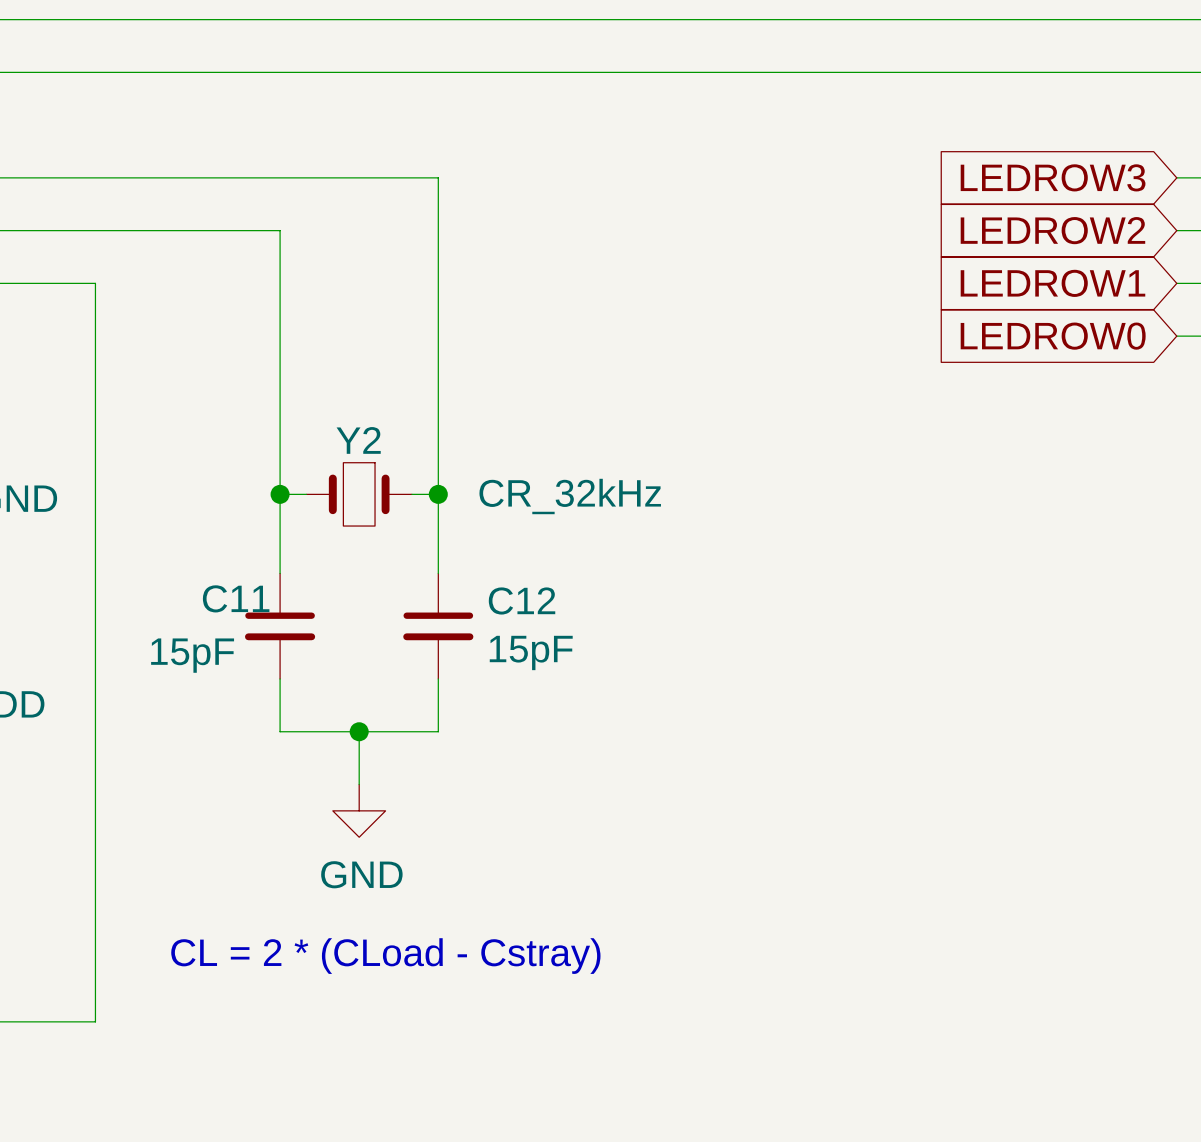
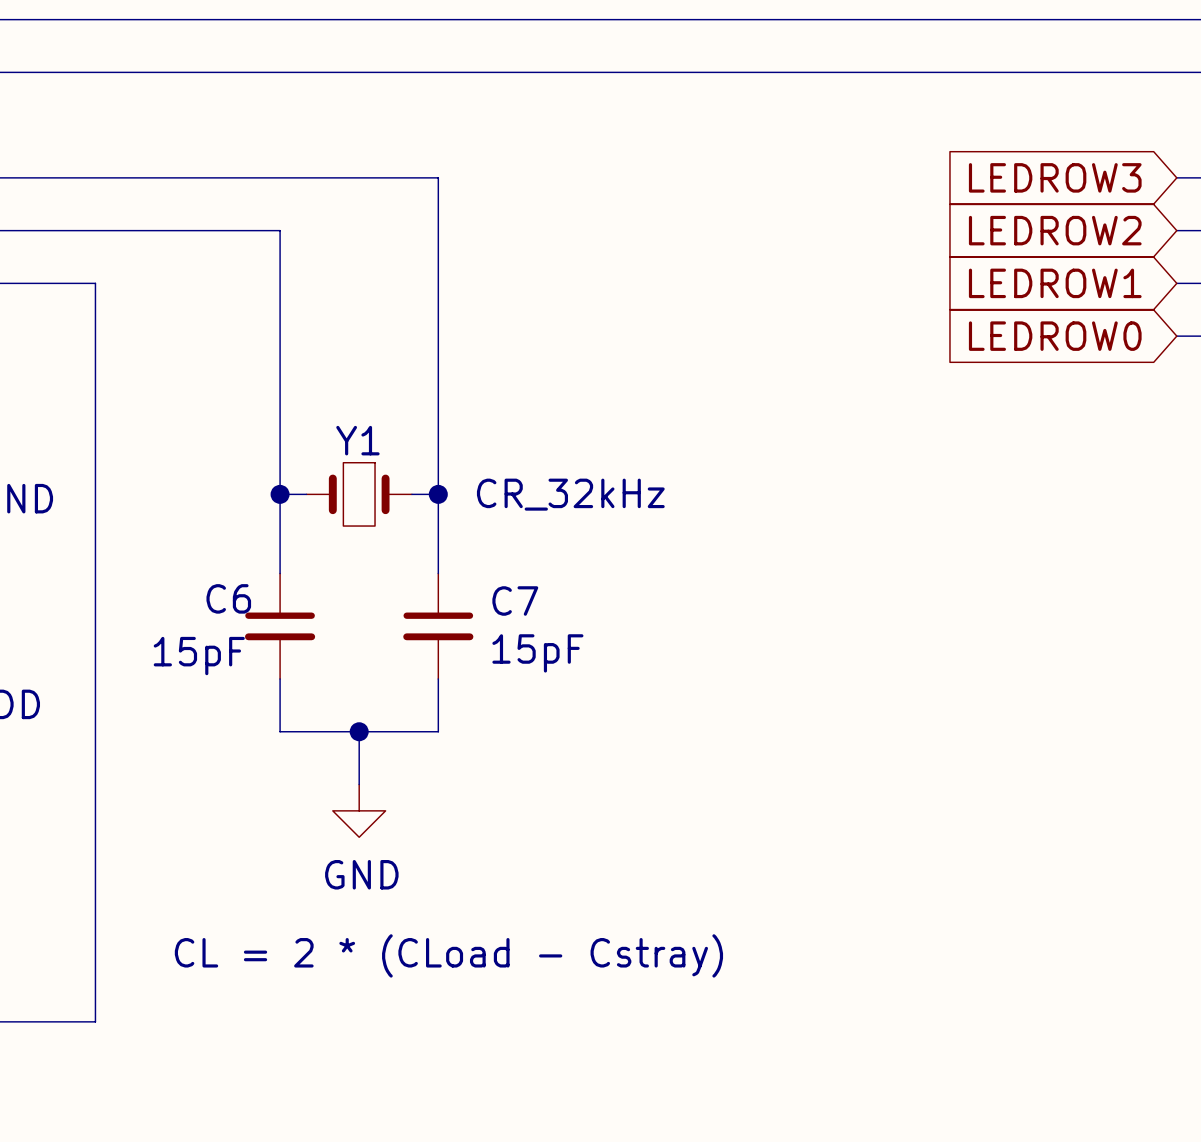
Y2 name: Y2 (358, 440) -> Y1 (357, 440)
C11 name: C11 (236, 598) -> C6 (228, 598)
C12 name: C12 (522, 600) -> C7 (515, 601)

